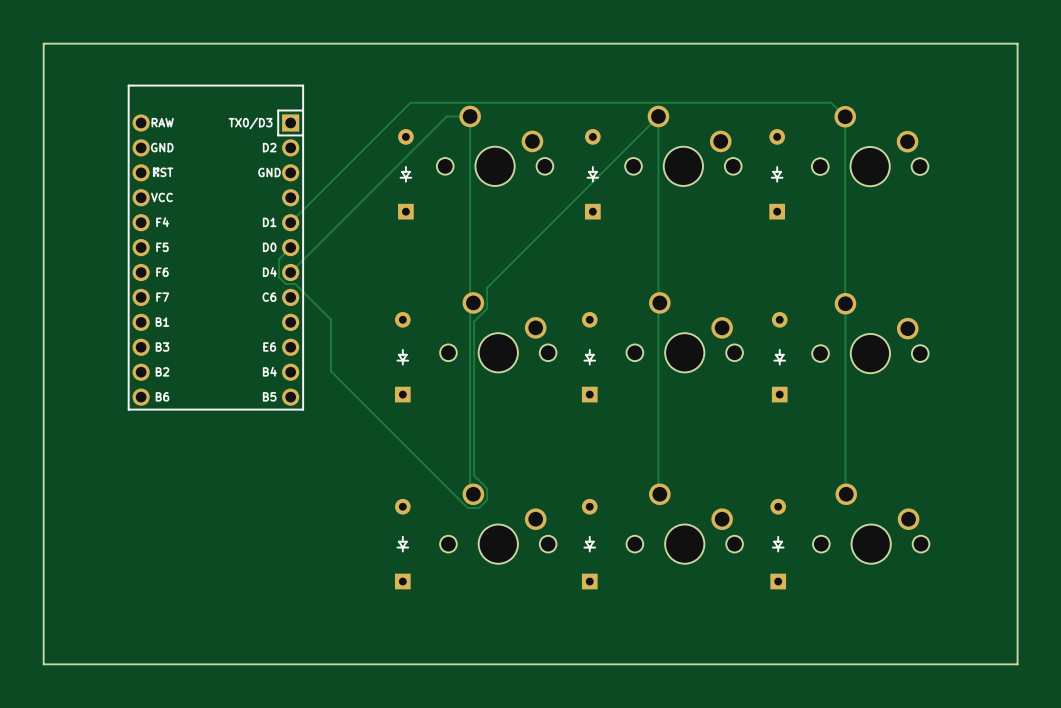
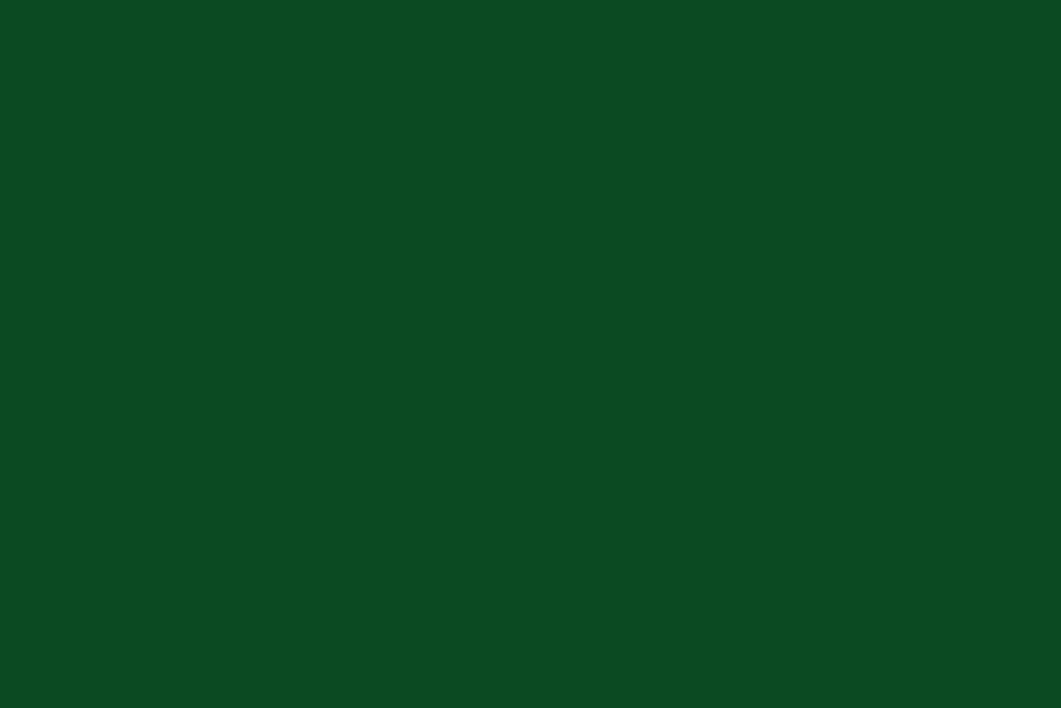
board edge: (1017, 43) (43, 43) (43, 664) (1017, 664) (1017, 43) -> none
part: (495, 145) -> none
part: (683, 145) -> none
part: (870, 146) -> none
part: (405, 174) -> none
part: (592, 174) -> none
part: (777, 174) -> none
track: (290, 222) (410, 102) (831, 102) (845, 116) (846, 494) -> none
part: (215, 247) -> none
track: (290, 247) (279, 259) (279, 277) (285, 284) (295, 284) (330, 319) (330, 371) (467, 508) (479, 508) (487, 499) (487, 488) (474, 475) (474, 321) (487, 308) (487, 287) (658, 116) (659, 494) -> none
track: (290, 272) (446, 116) (470, 116) (470, 491) (473, 494) -> none
part: (498, 332) -> none
part: (684, 332) -> none
part: (870, 333) -> none
part: (402, 357) -> none
part: (589, 357) -> none
part: (779, 357) -> none
part: (498, 523) -> none
part: (684, 523) -> none
part: (871, 523) -> none
part: (402, 544) -> none
part: (589, 544) -> none
part: (778, 544) -> none

